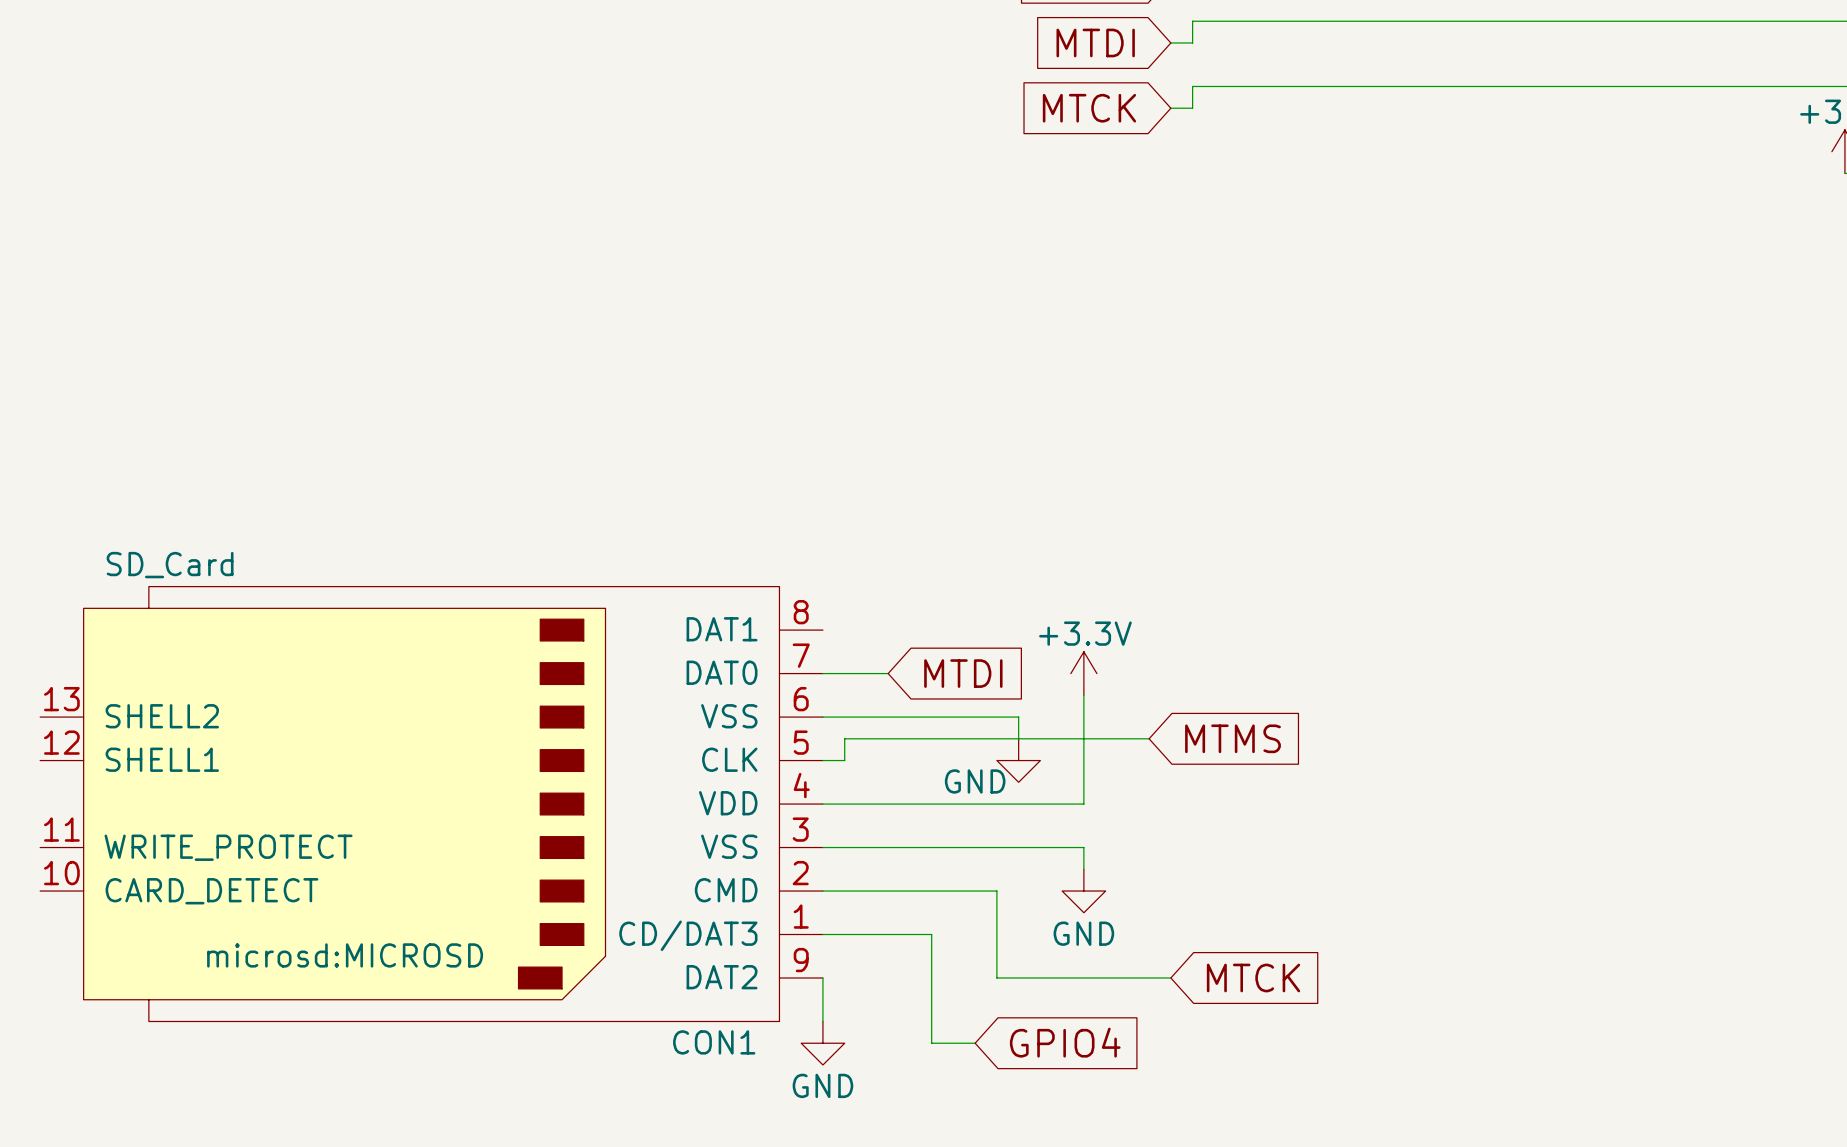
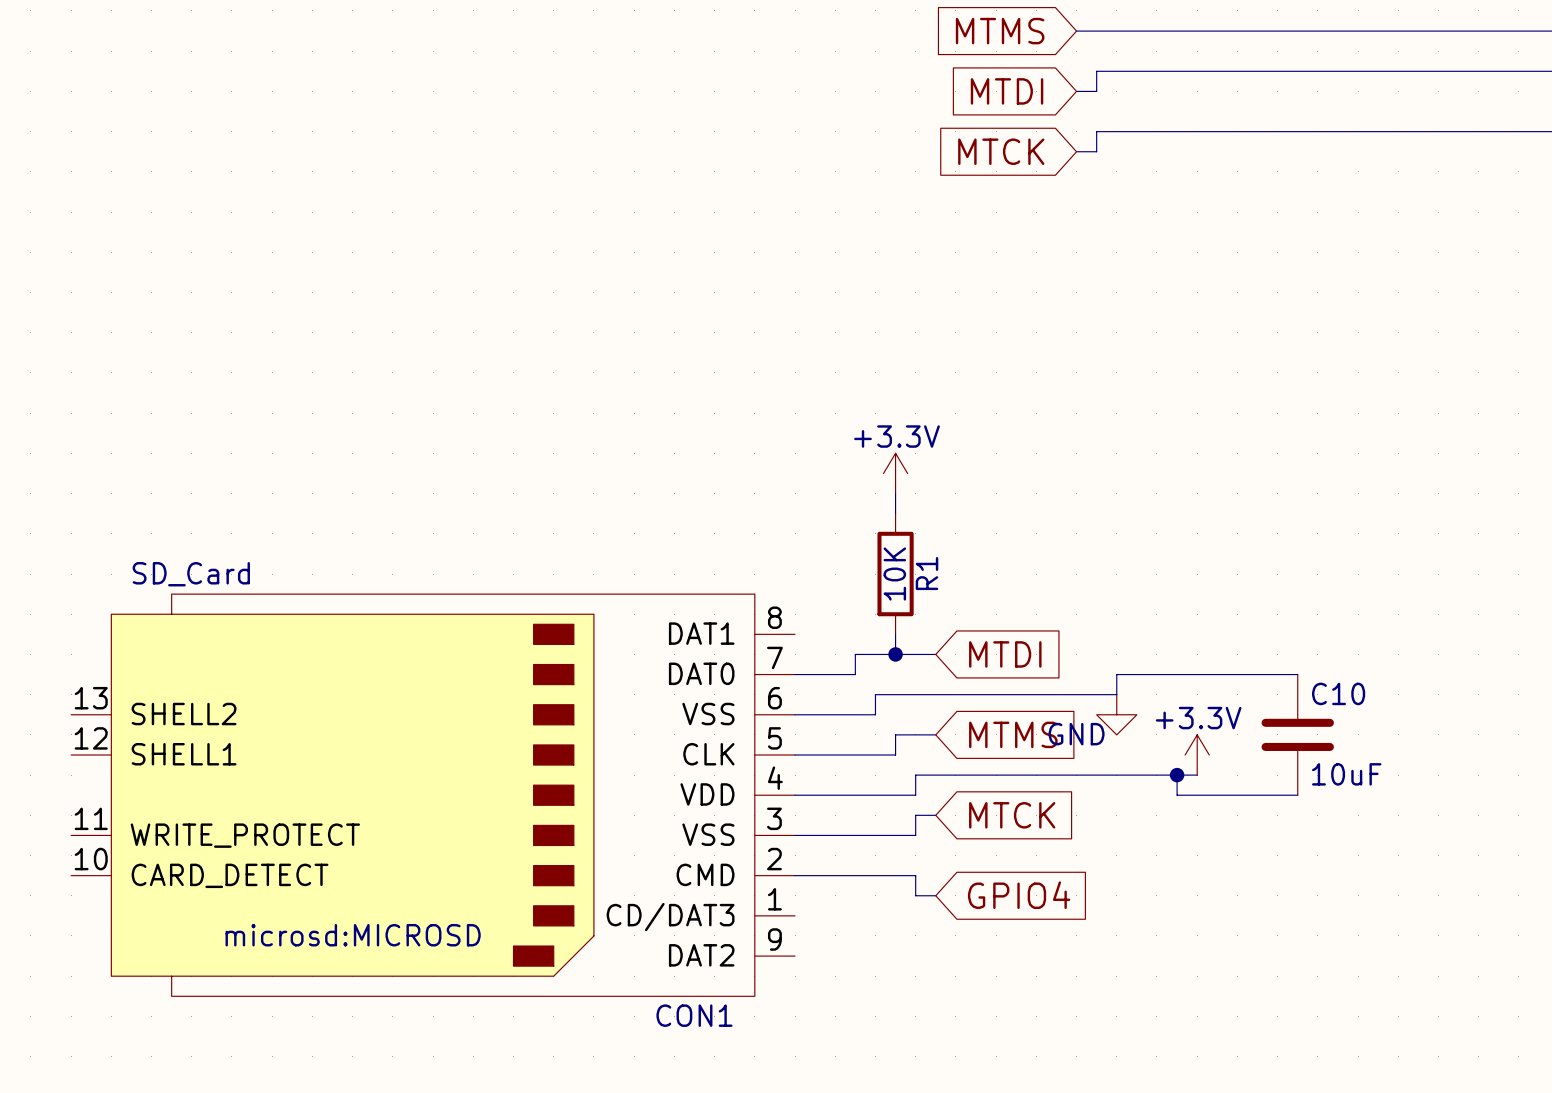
power symbol: none -> +3.3V (895, 473)
wire: none -> (895, 493) (895, 513)
R1: none -> 10K (895, 574)
wire: none -> (895, 634) (895, 654)
junction: none -> (895, 654)
wire: none -> (935, 654) (855, 654) (855, 674) (815, 674)
global label position: MTDI (963, 673) -> MTDI (1005, 654)
power symbol: +3.3V (1083, 673) -> none
wire: (1083, 695) (1083, 804) (996, 804) -> (1197, 775) (915, 775) (915, 795)
wire: (953, 717) (1018, 717) (1018, 738) (1149, 738) -> (875, 714) (875, 694) (1116, 694) (1116, 674) (1297, 674)
power symbol: none -> GND (1116, 714)
wire: (975, 738) (844, 738) (844, 760) (822, 760) -> (895, 734) (895, 754) (795, 754)
global label position: MTMS (1232, 738) -> MTMS (1013, 734)
C10: none -> 10uF (1297, 734)
power symbol: GND (1018, 760) -> none
power symbol: none -> +3.3V (1197, 754)
wire: none -> (1177, 775) (1177, 795) (1297, 795)
junction: none -> (1177, 775)
CON1 position: (431, 804) -> (433, 795)
wire: (996, 847) (1083, 847) (1083, 869) -> (915, 835) (915, 815) (935, 815)
power symbol: GND (1083, 891) -> none
wire: (996, 912) (996, 978) (1170, 978) -> (915, 895) (935, 895)
wire: (822, 934) (931, 934) (931, 1043) (975, 1043) -> none
global label position: MTCK (1253, 978) -> MTCK (1012, 815)
global label position: GPIO4 (1065, 1042) -> GPIO4 (1019, 895)
power symbol: GND (822, 1043) -> none

